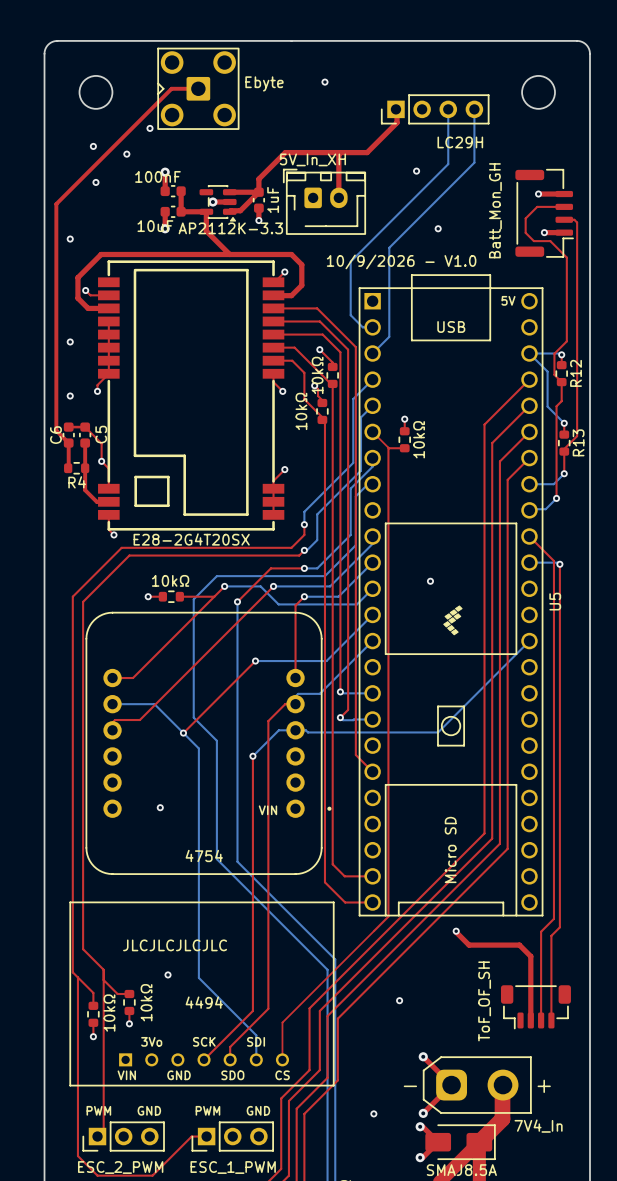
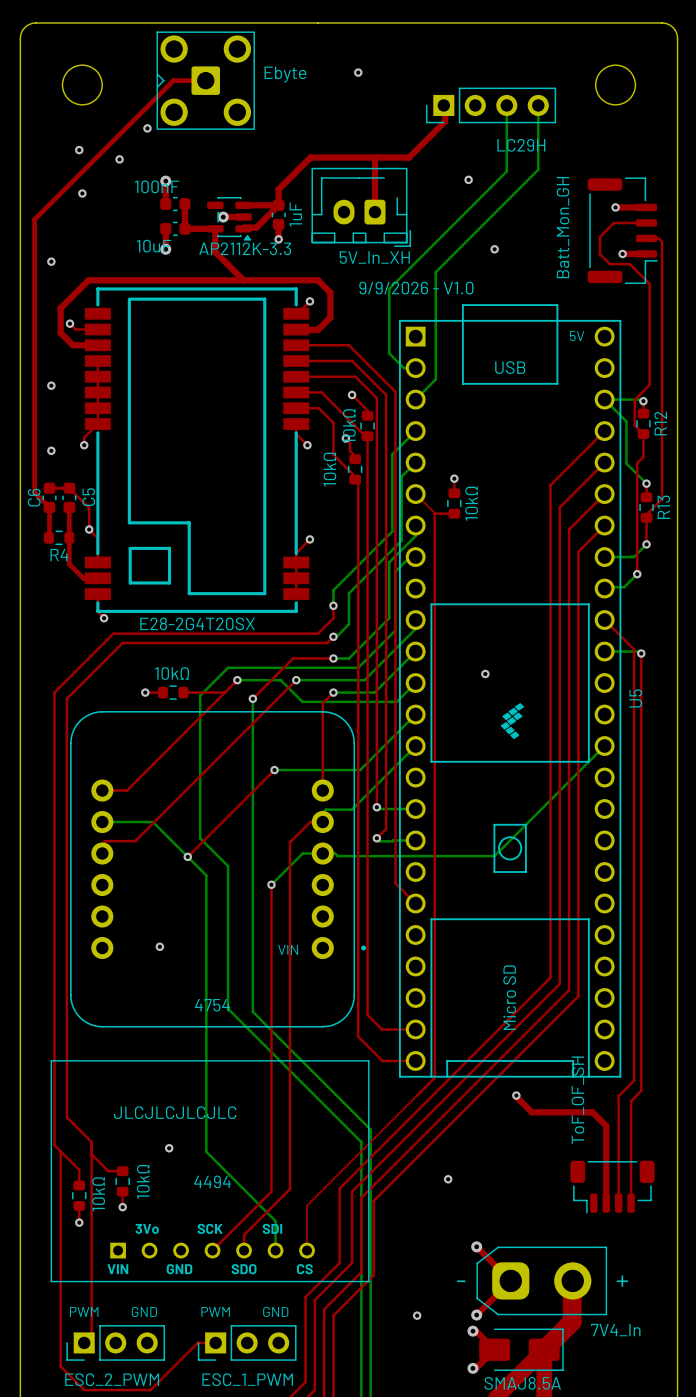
part rotation: 0° (324, 201) -> 180° (361, 207)
text: 10/9/2026 - V1.0 (401, 261) -> 9/9/2026 - V1.0 (416, 288)
part value position: ToF_OF_SH (484, 1001) -> ToF_OF_SH (577, 1100)

